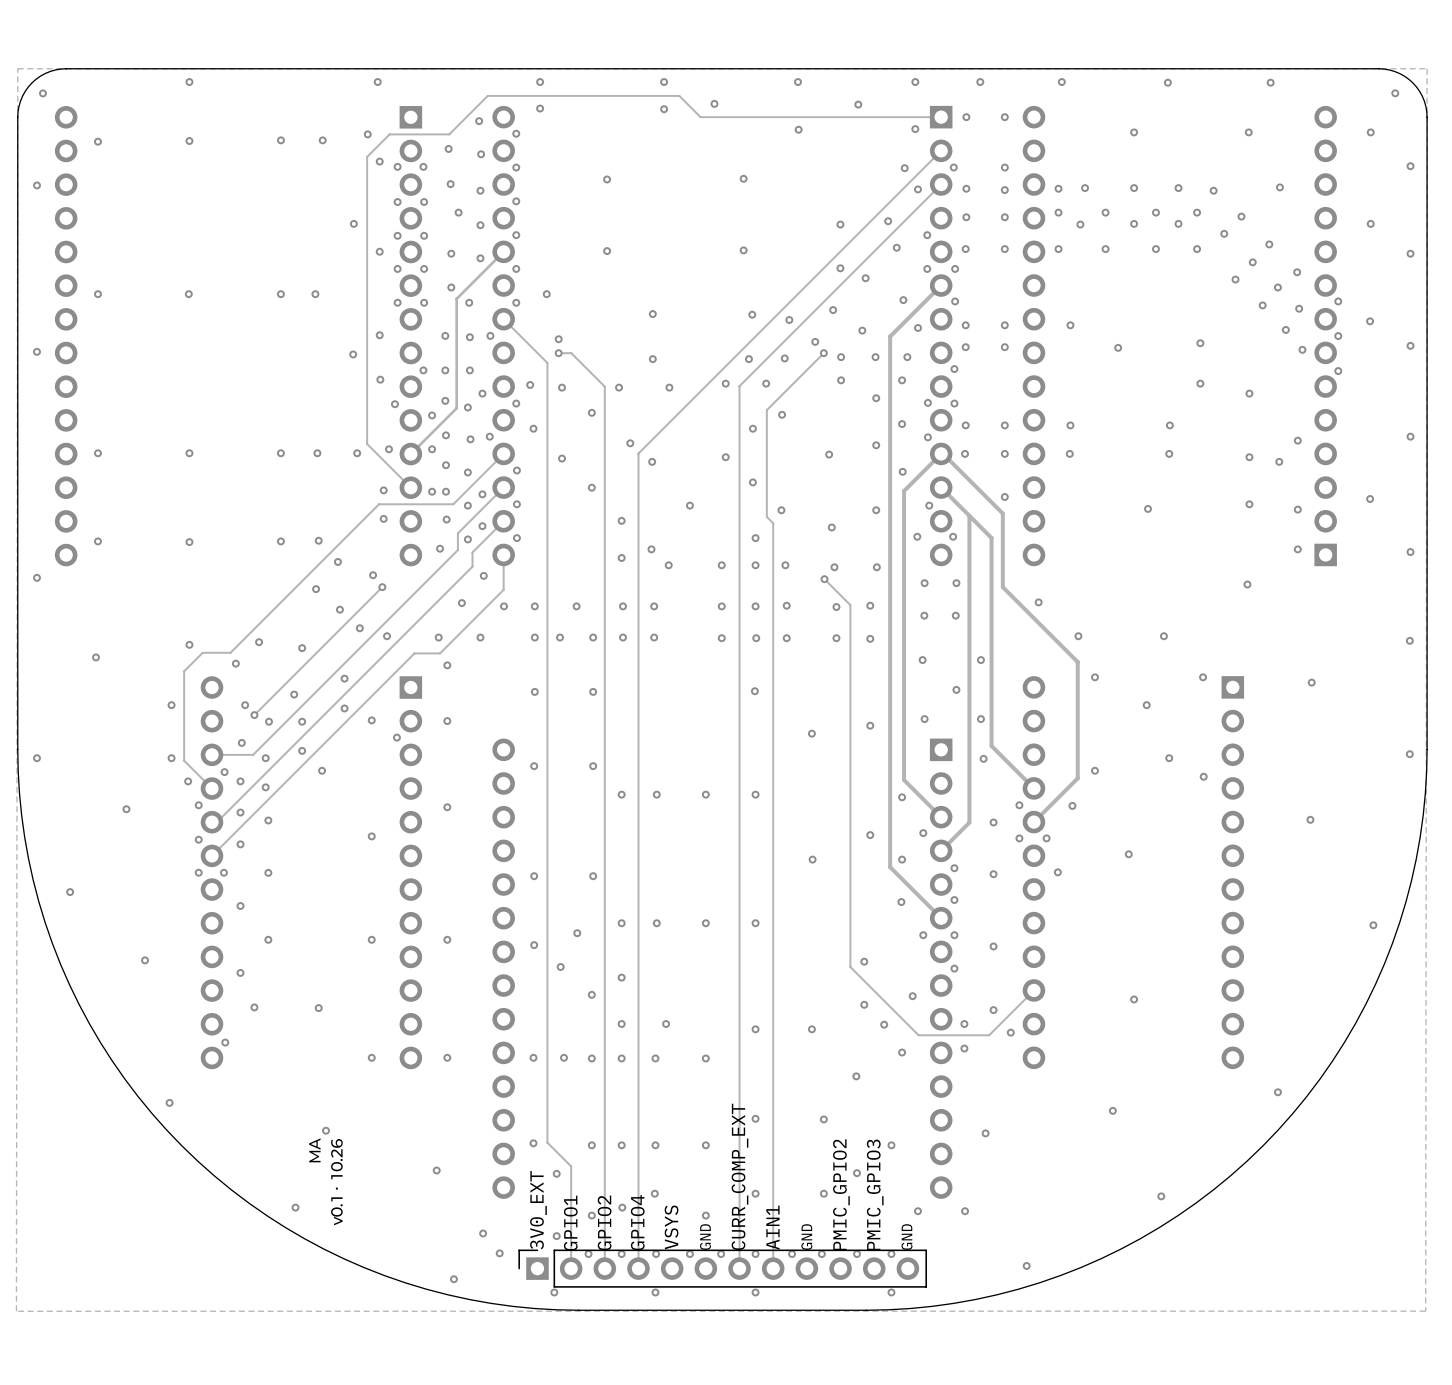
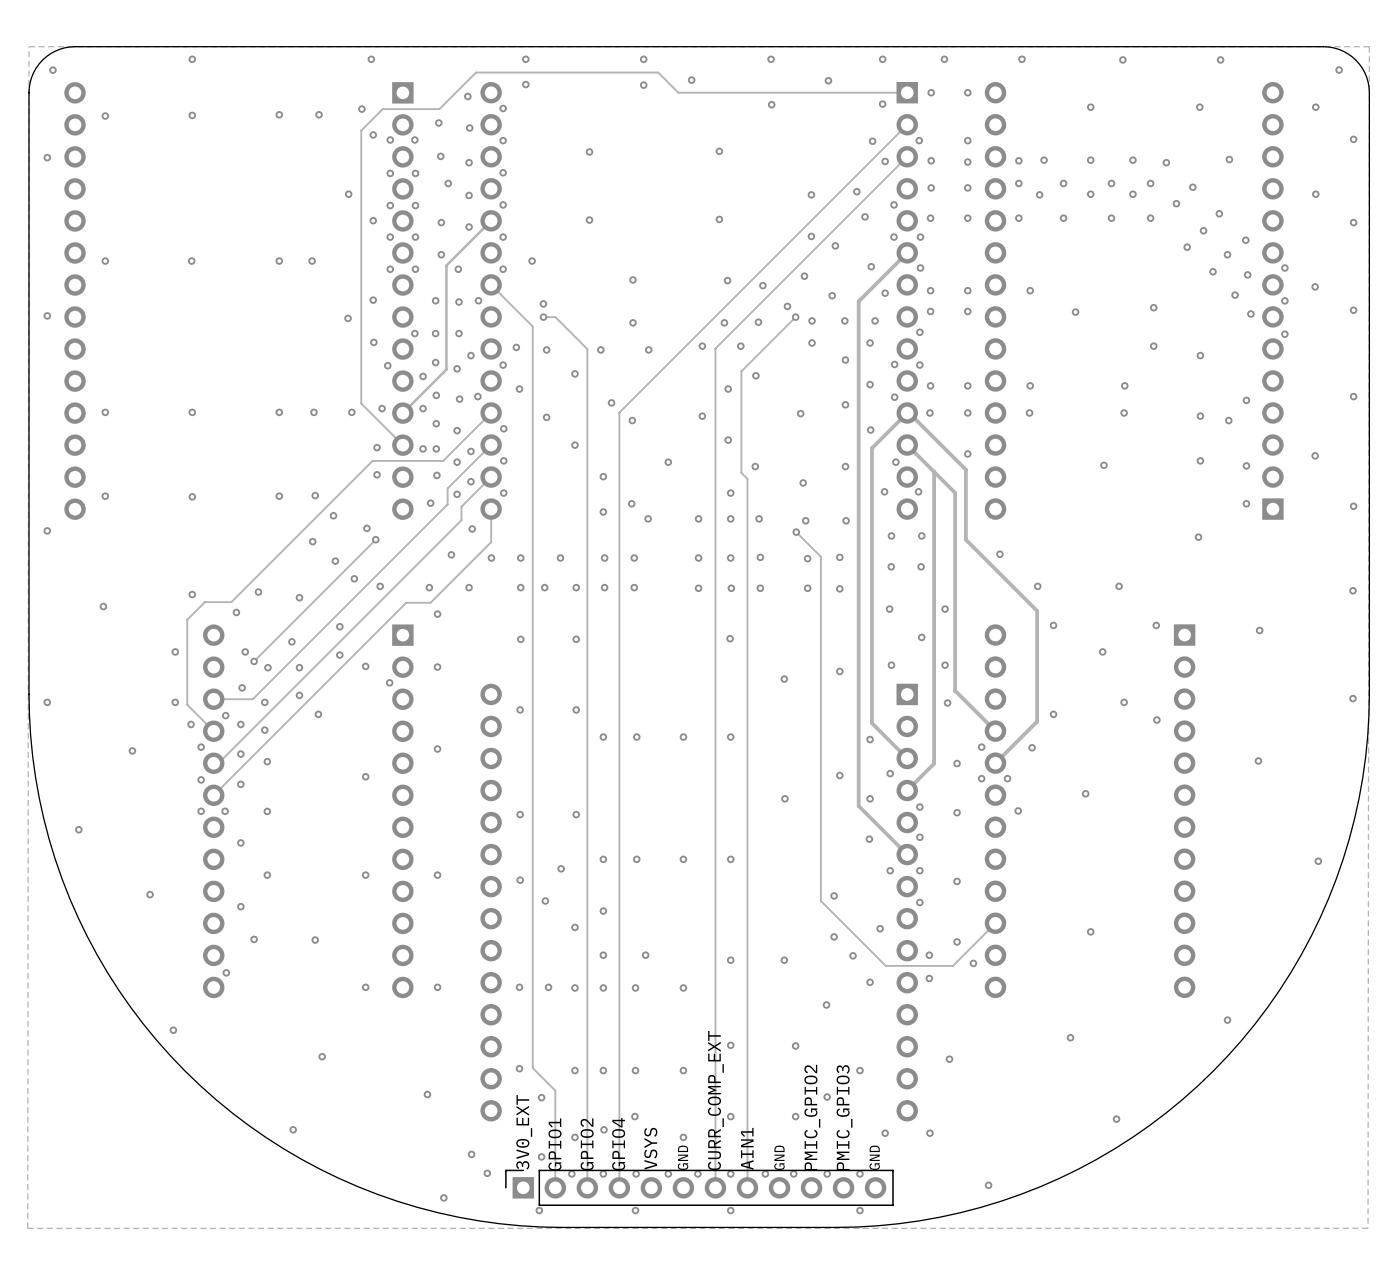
drawing: [309, 1138, 343, 1226] -> none

